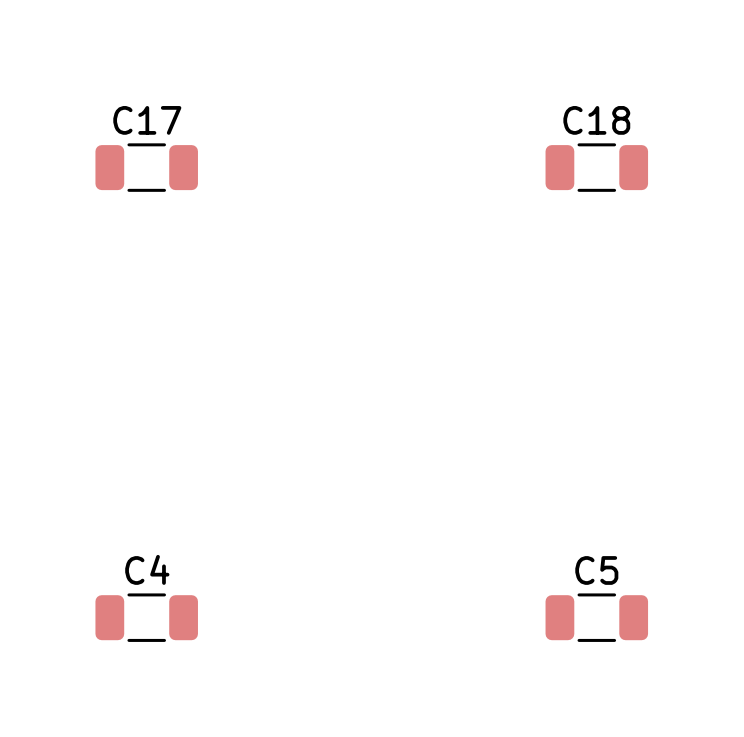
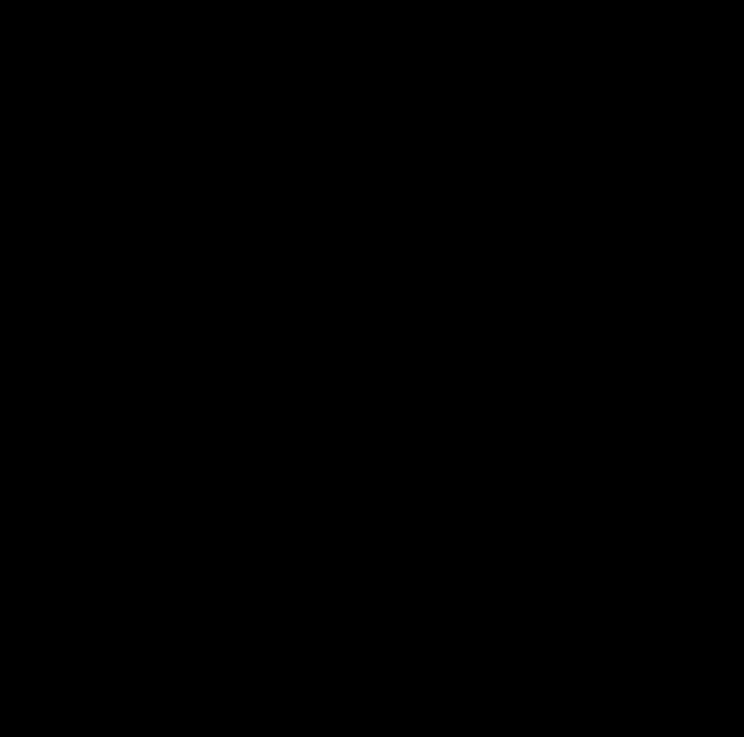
C17: (146, 167) -> none
C18: (596, 167) -> none
C4: (146, 617) -> none
C5: (596, 617) -> none

